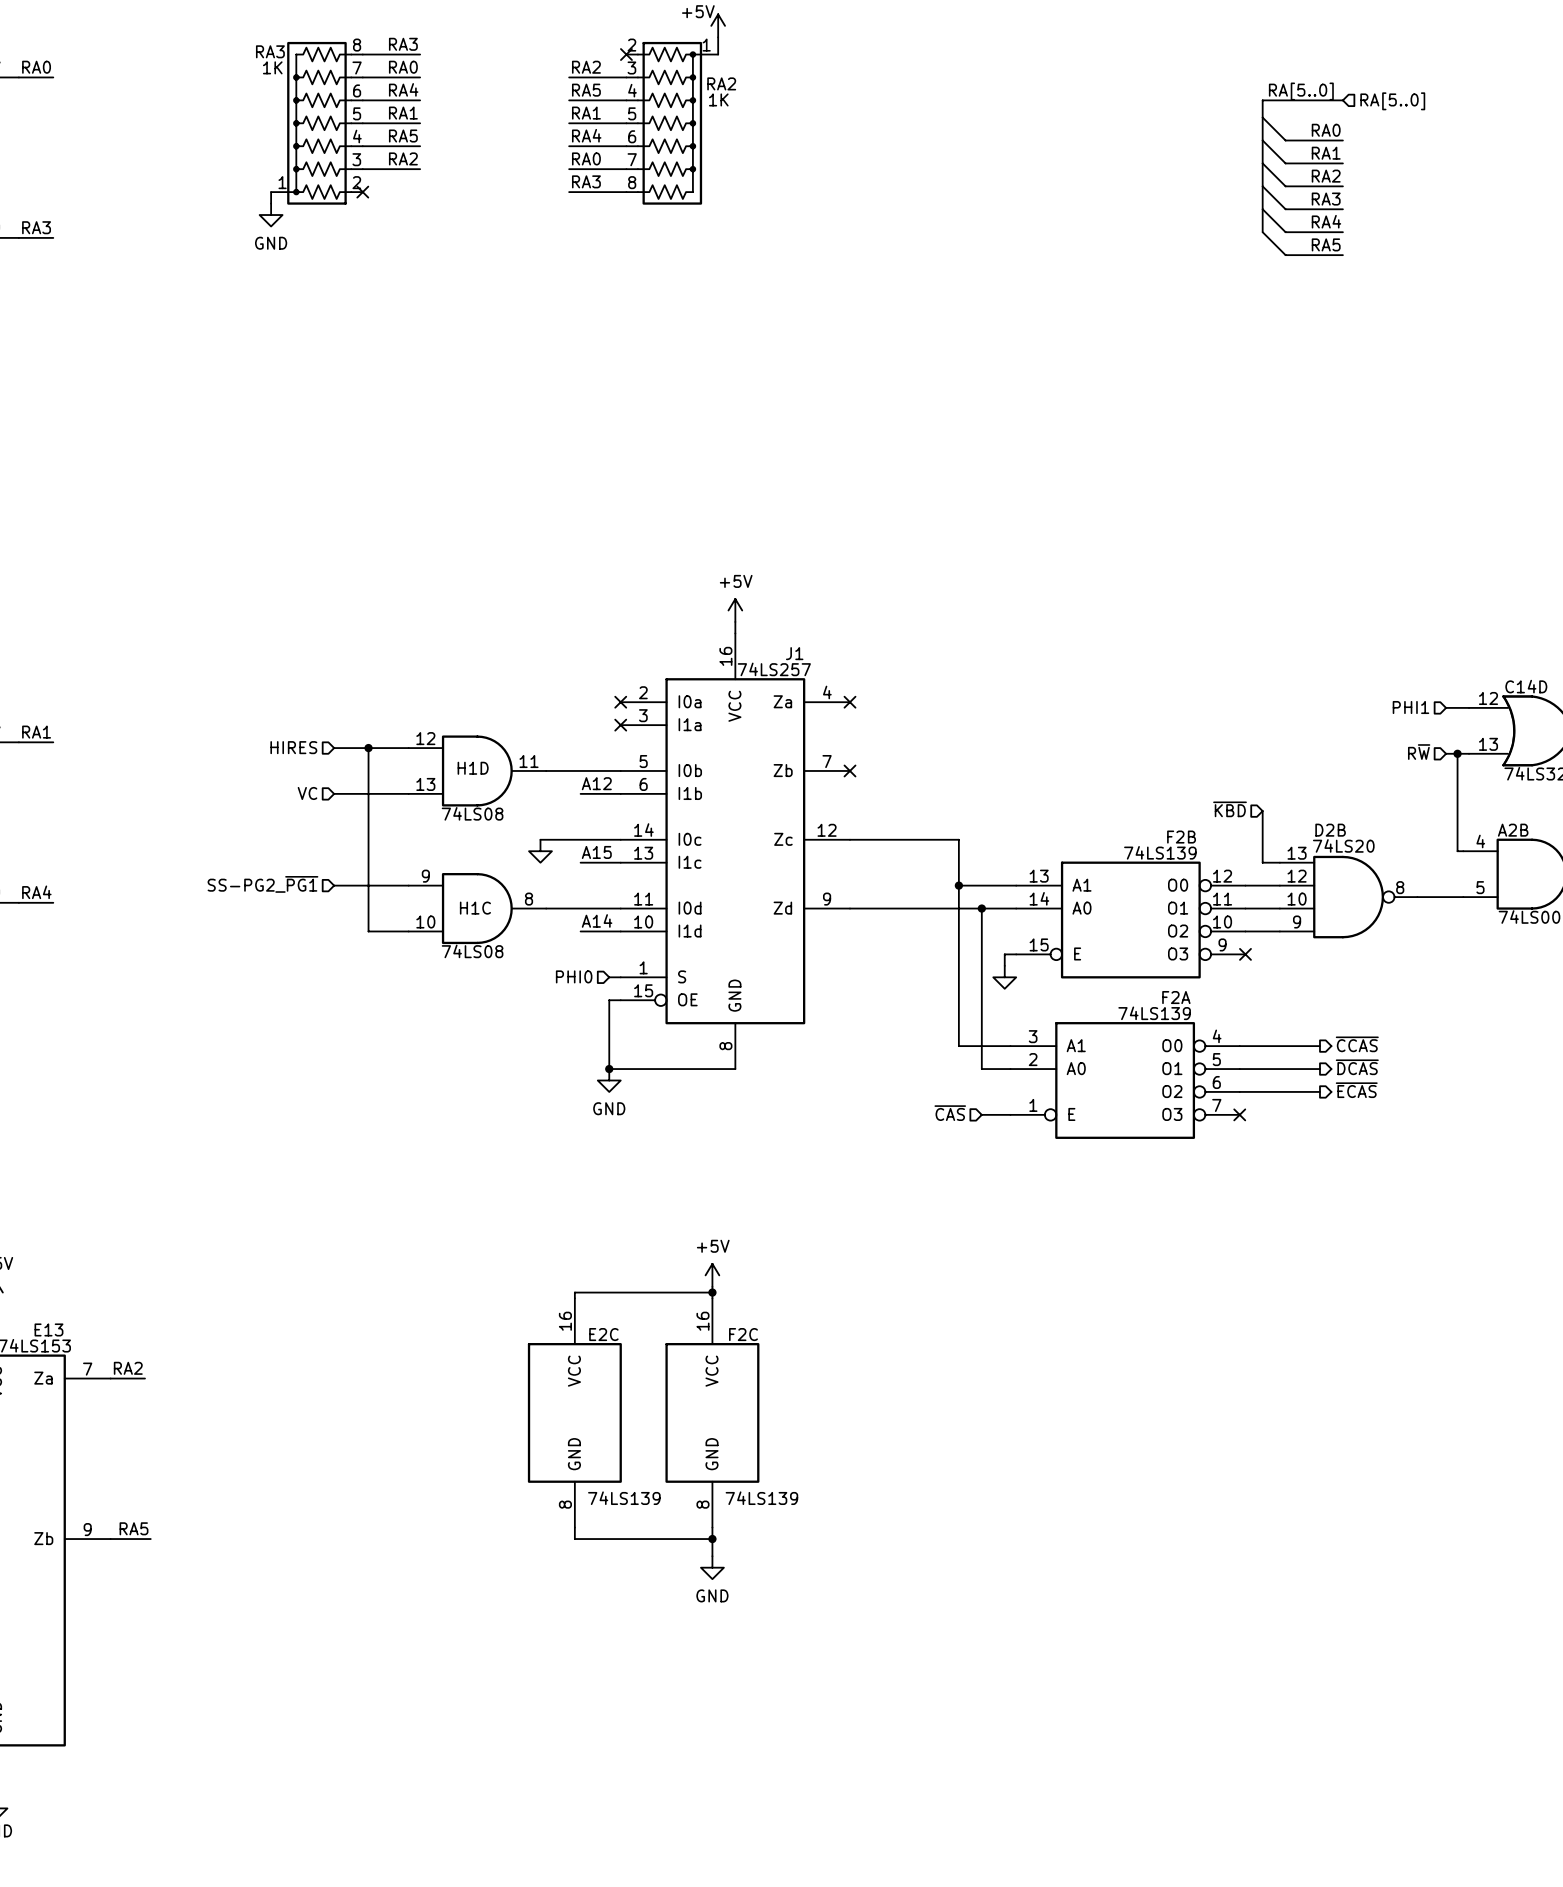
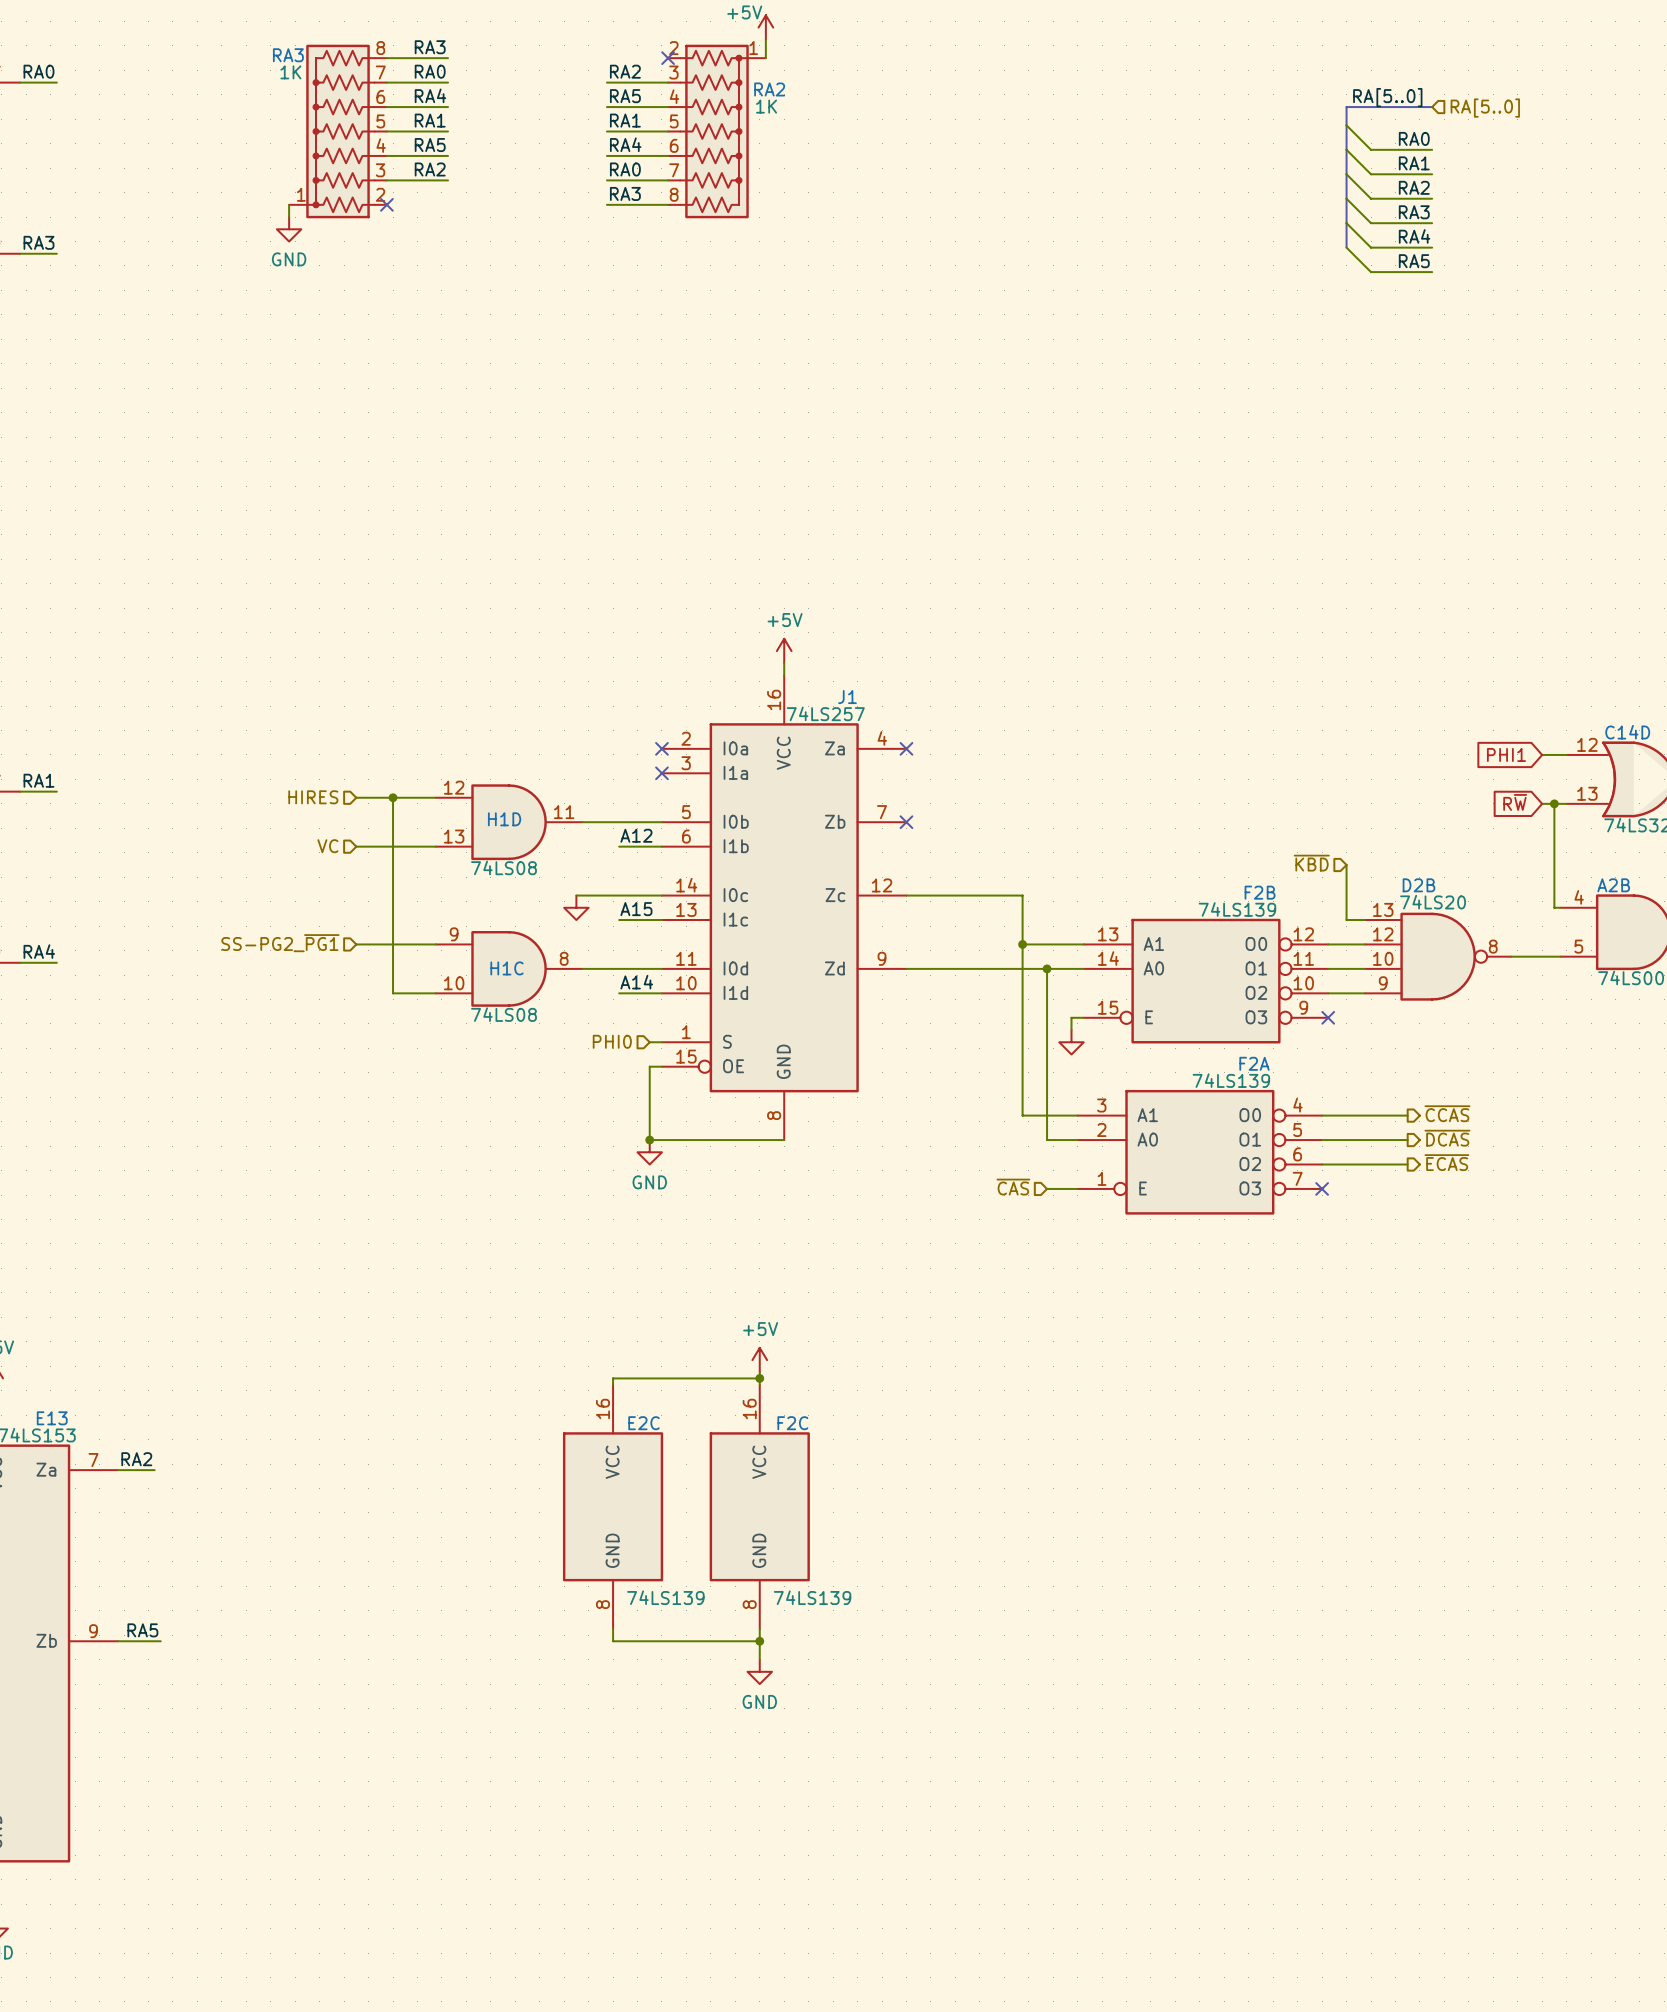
hierarchical label: PHI1 (1410, 707) -> none
global label: none -> PHI1 (1506, 754)
hierarchical label: R~{W} (1419, 752) -> none
global label: none -> R~{W} (1515, 802)

